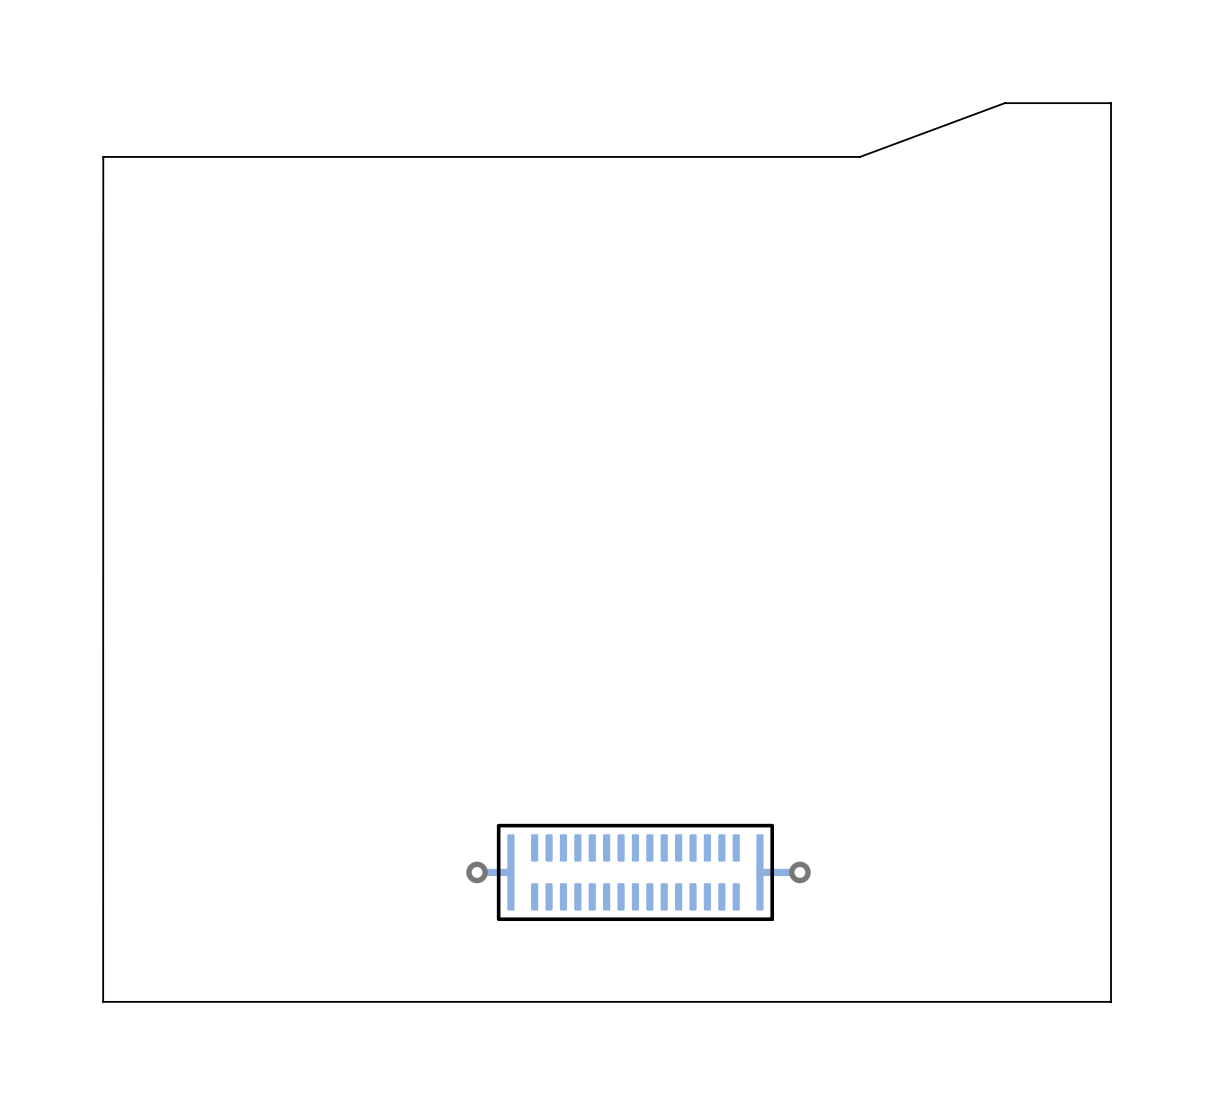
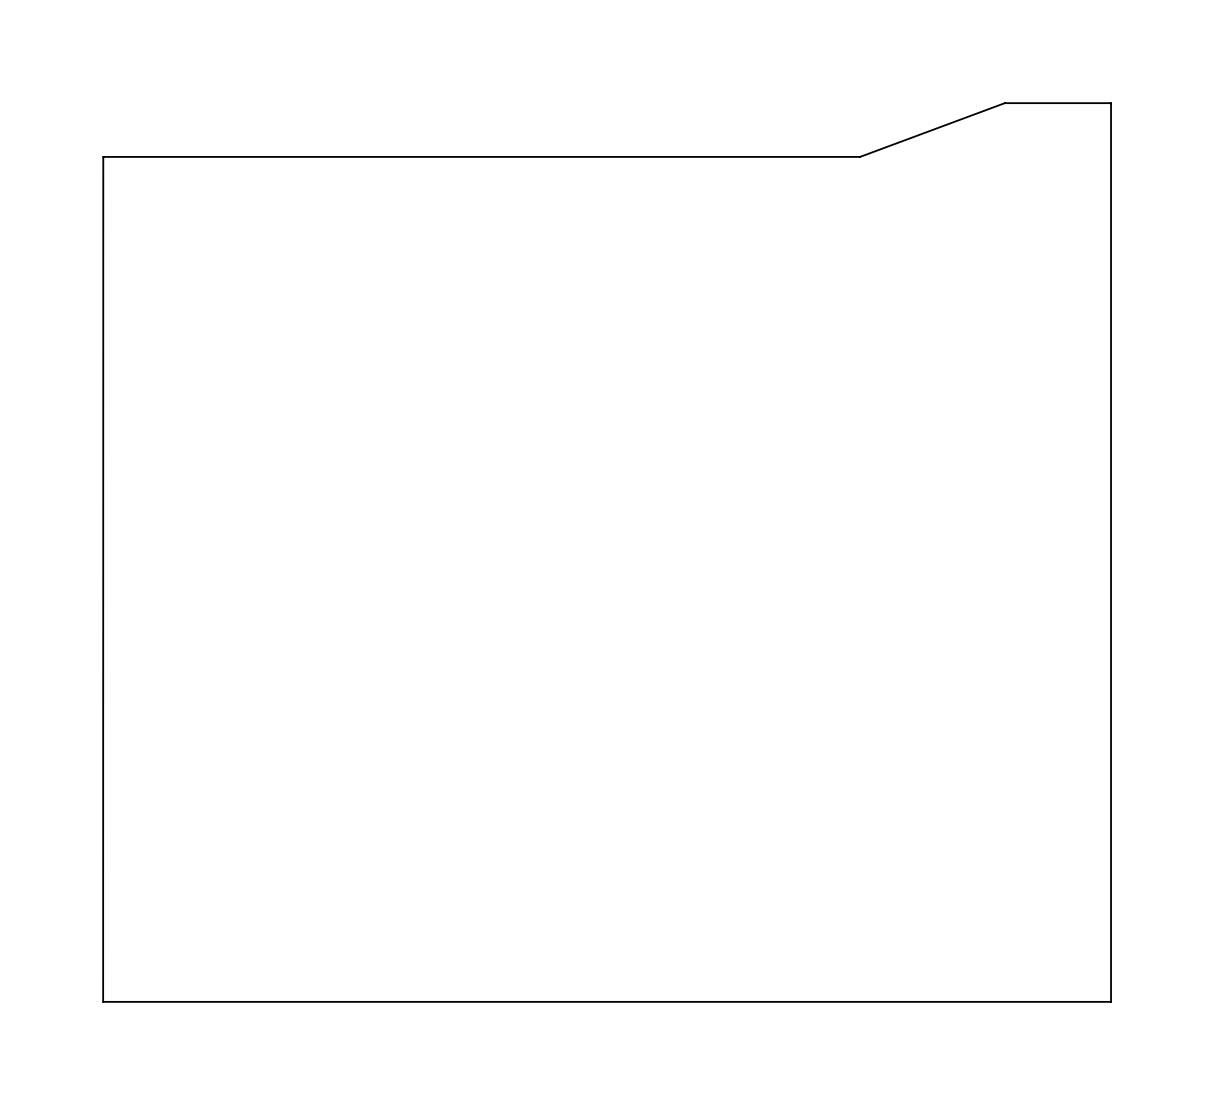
via: (477, 872) -> none
track: (510, 872) (477, 872) -> none
part: (635, 872) -> none
track: (799, 872) (759, 872) -> none
via: (799, 872) -> none

